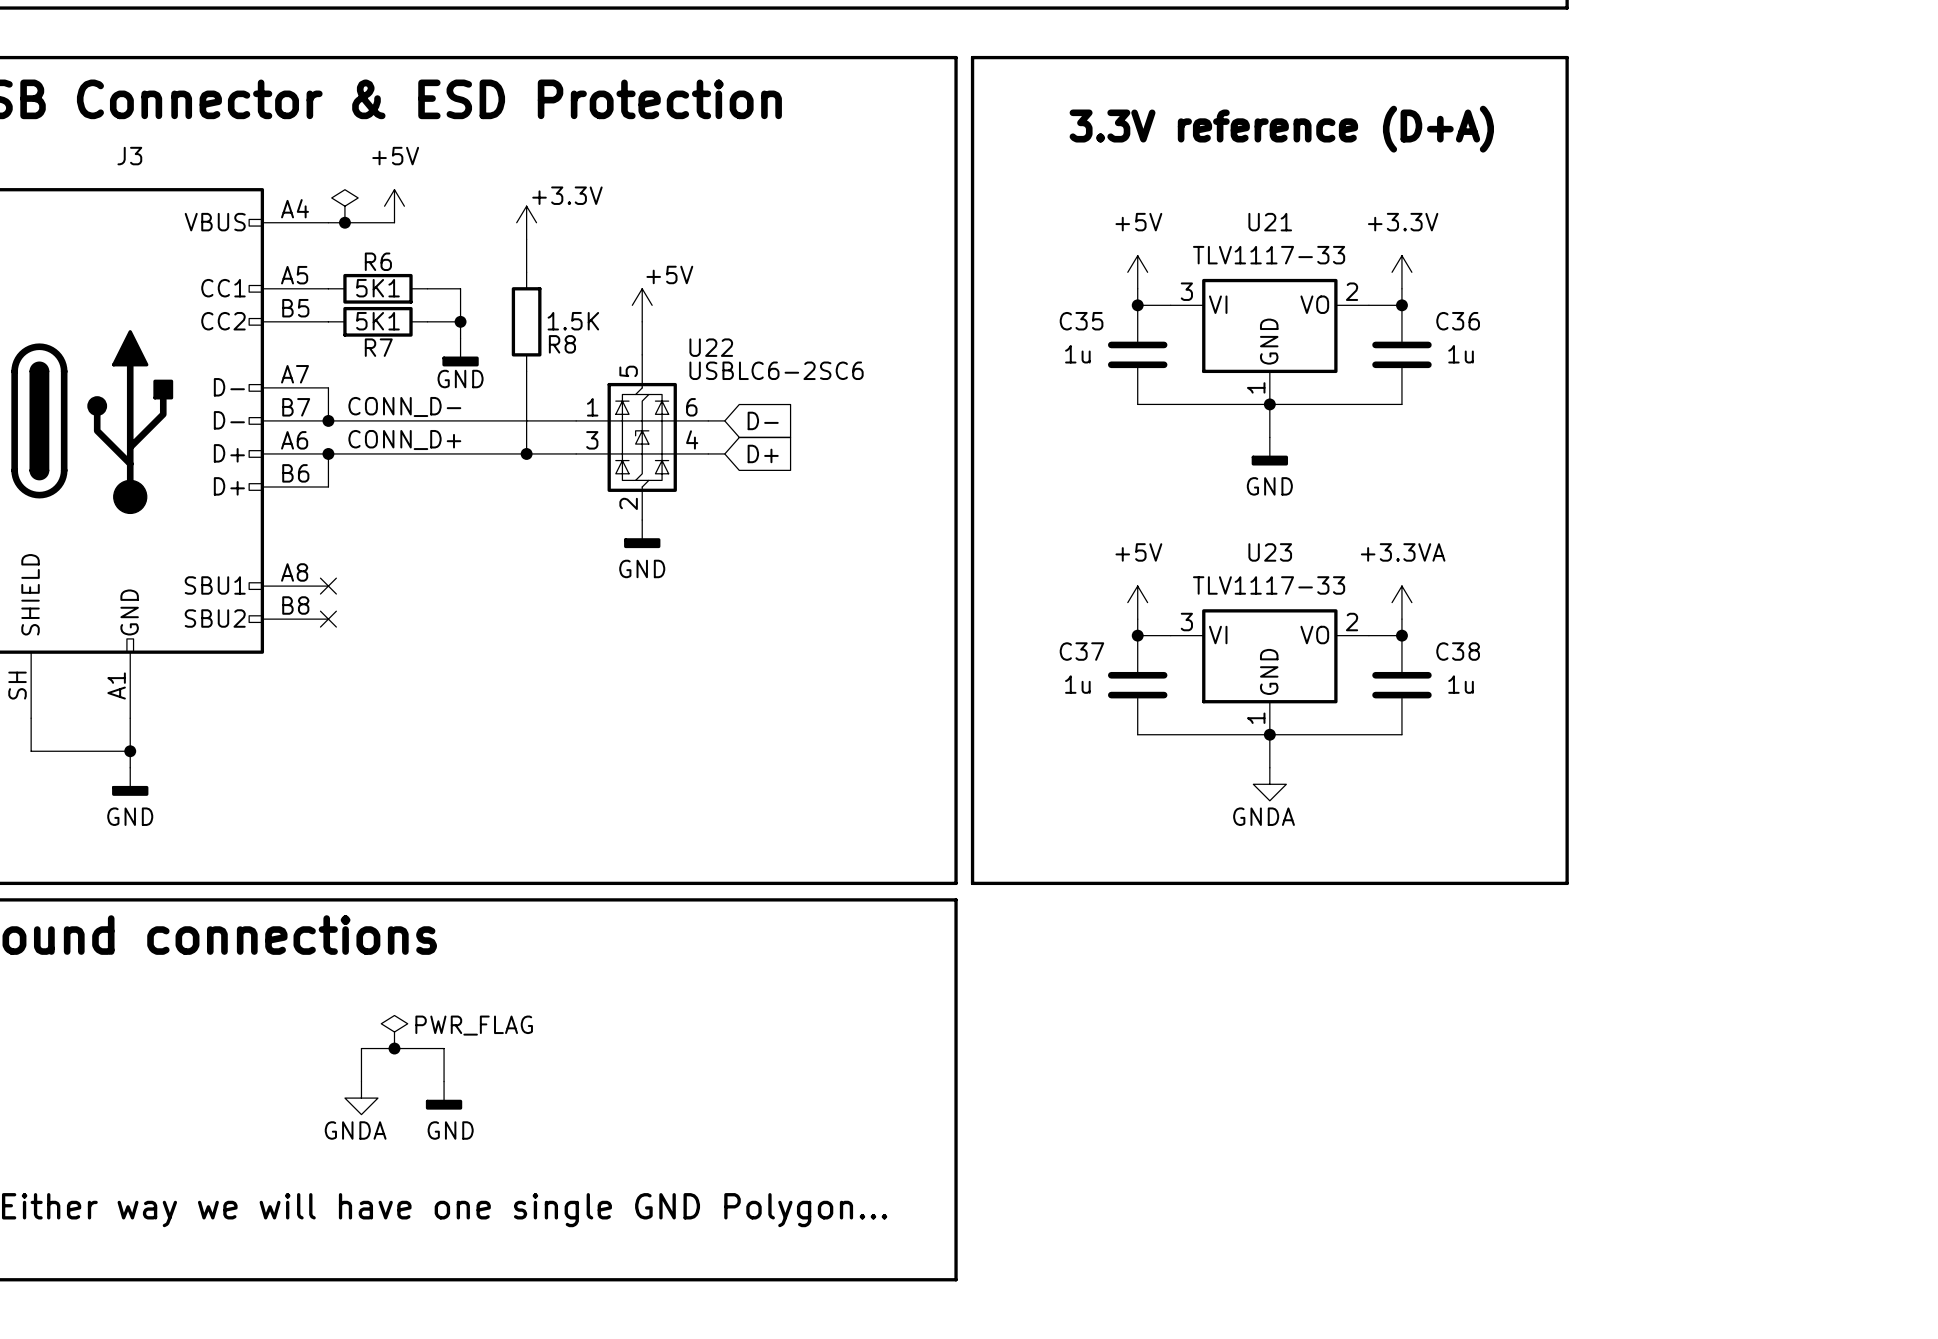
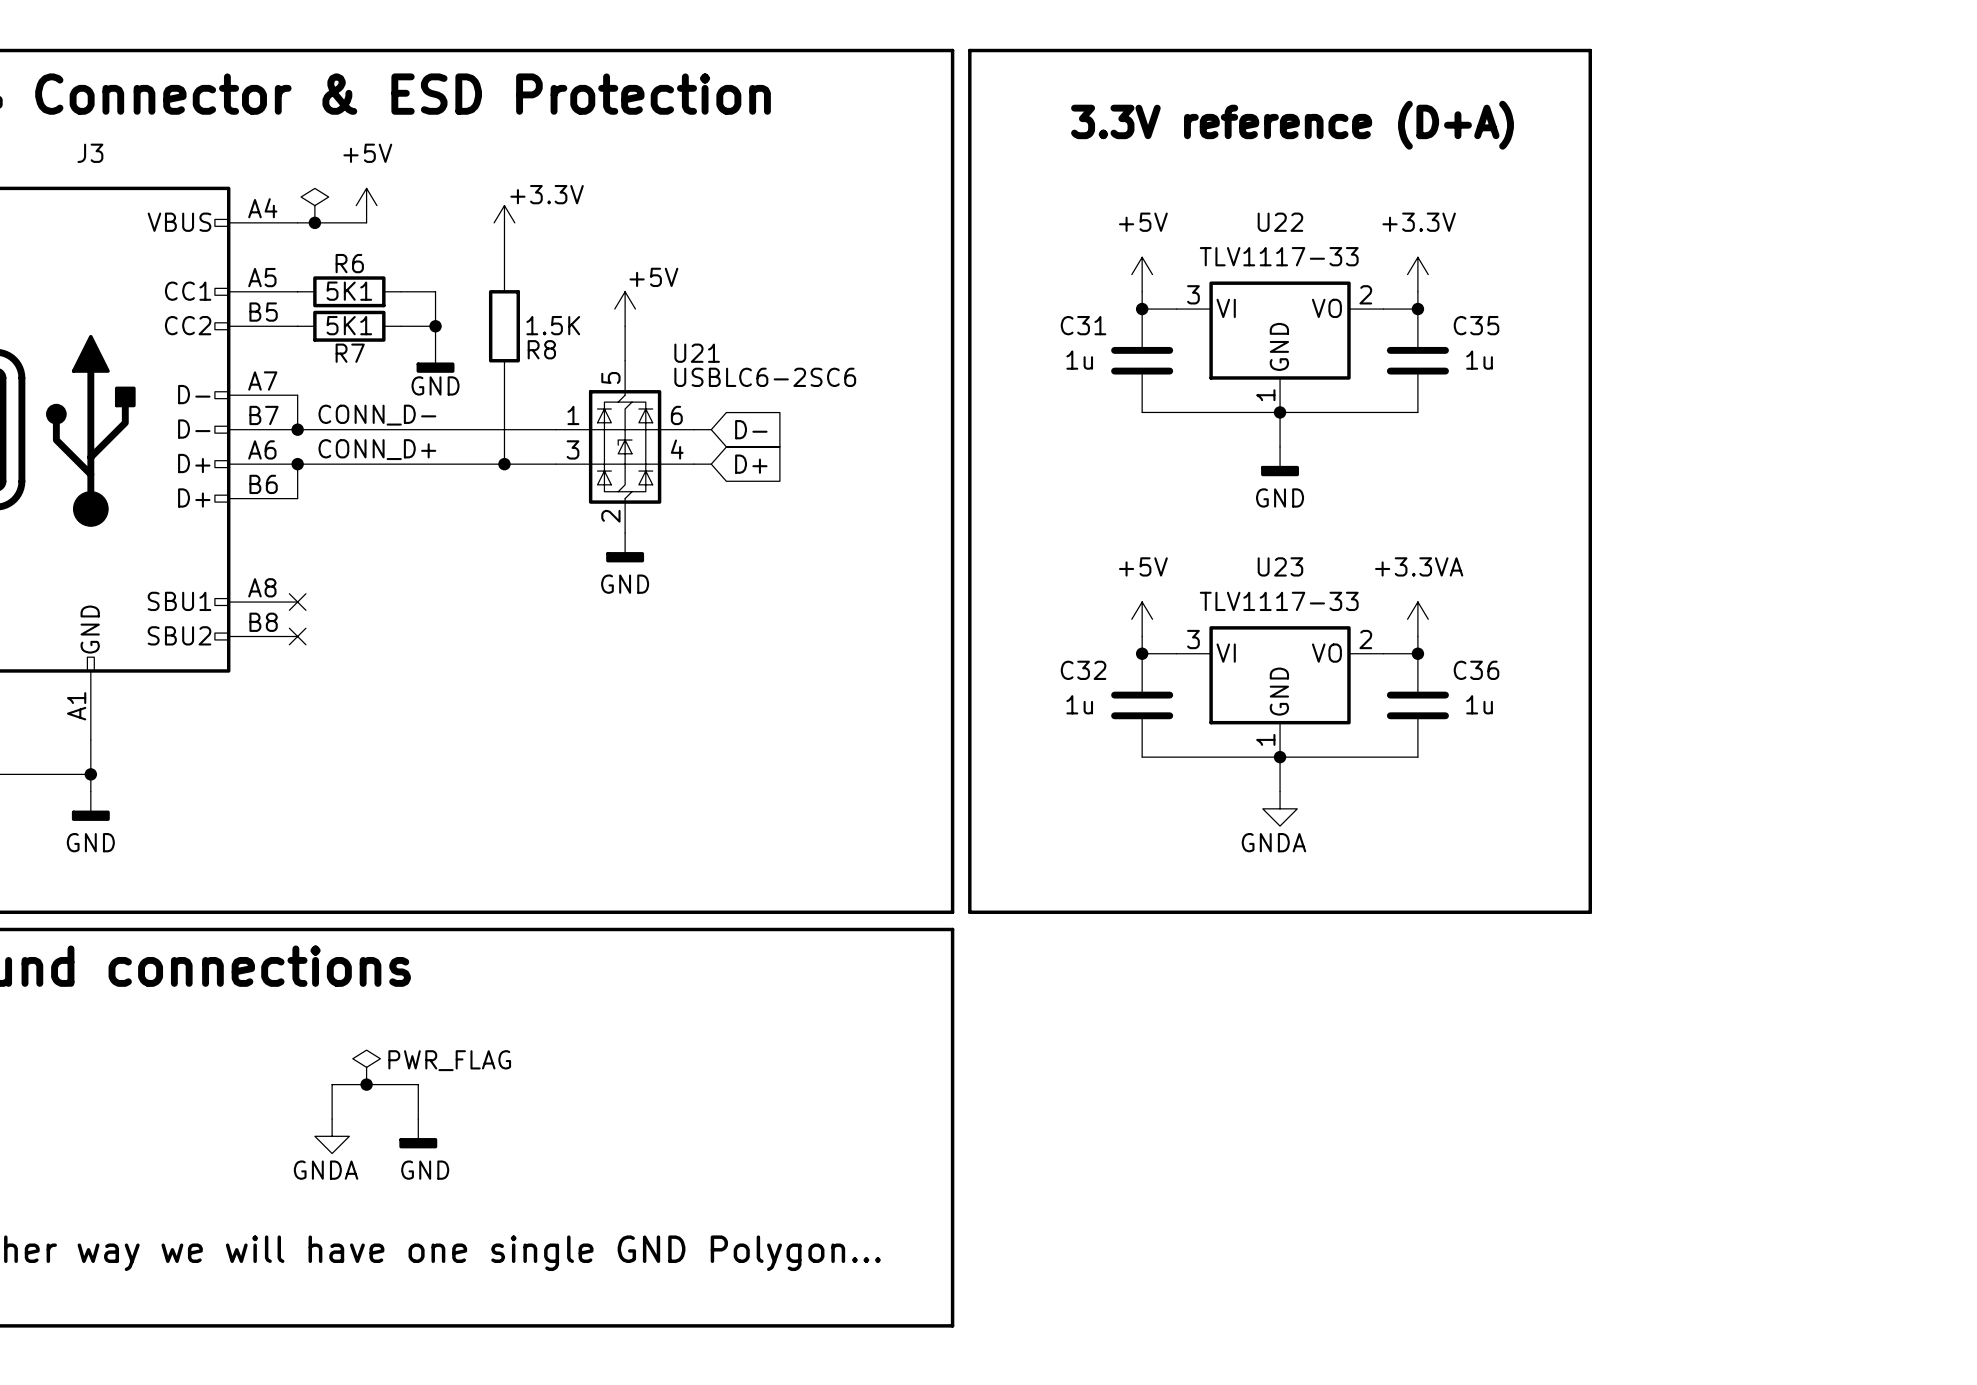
U21 name: U21 (1270, 222) -> U22 (1280, 222)
C35 name: C35 (1081, 321) -> C31 (1083, 325)
C36 name: C36 (1458, 321) -> C35 (1476, 325)
U22 name: U22 (711, 347) -> U21 (697, 353)
C37 name: C37 (1081, 651) -> C32 (1083, 670)
C38 name: C38 (1458, 651) -> C36 (1476, 670)

